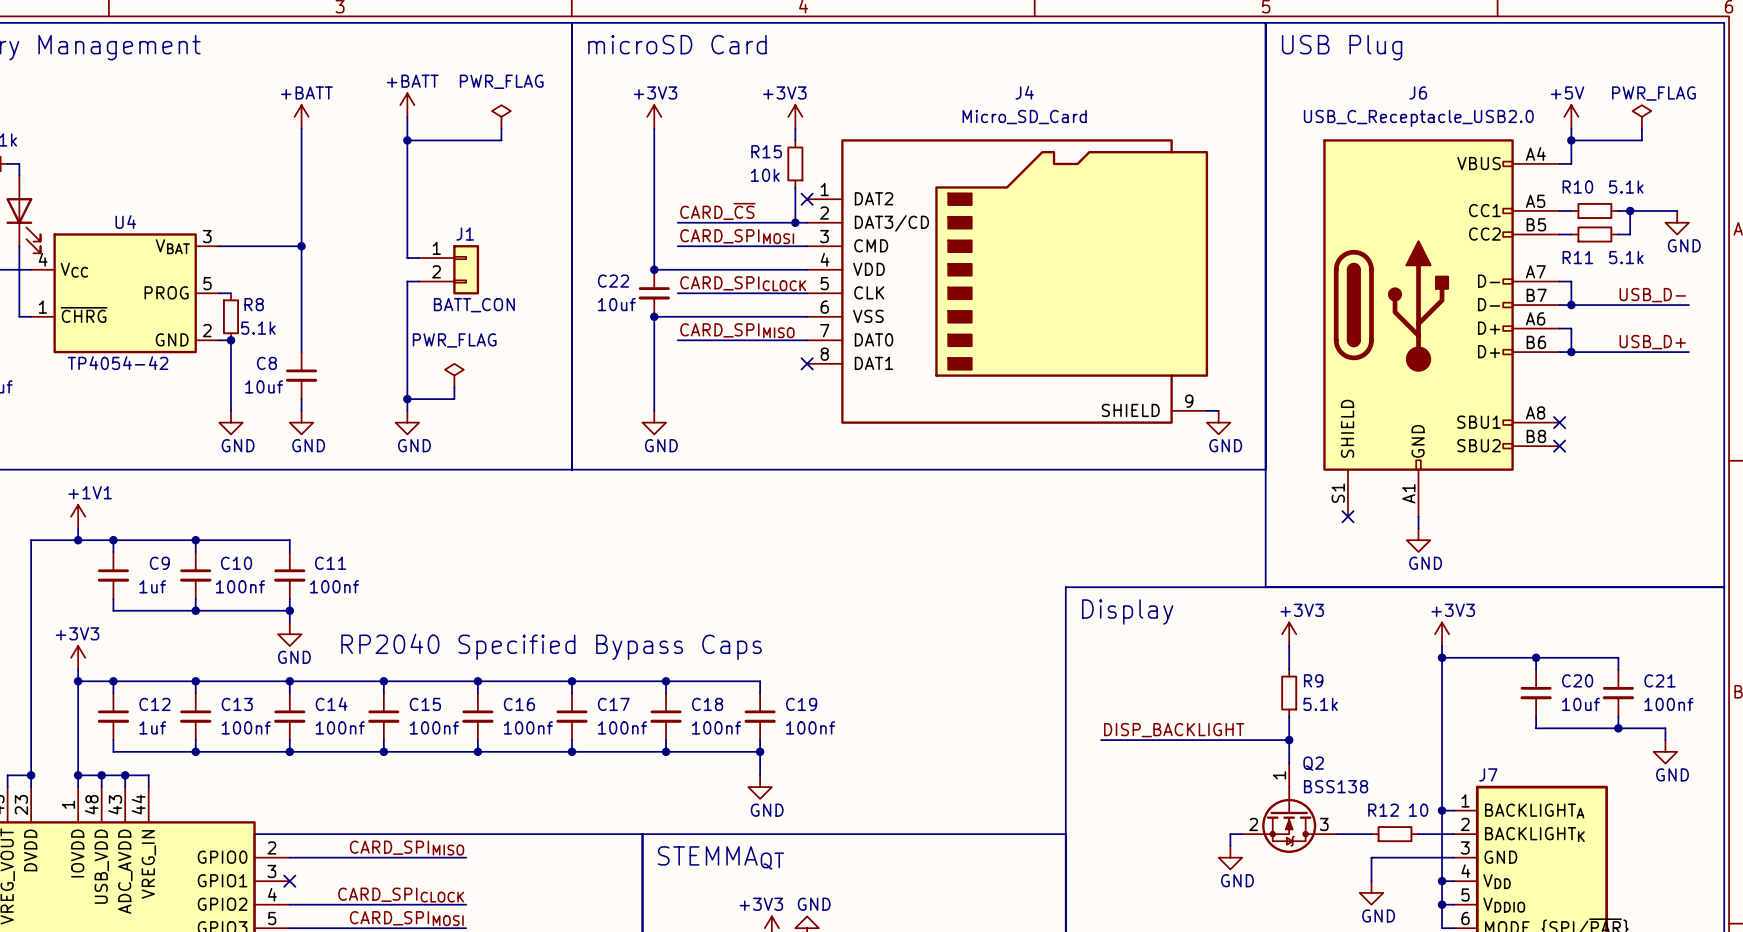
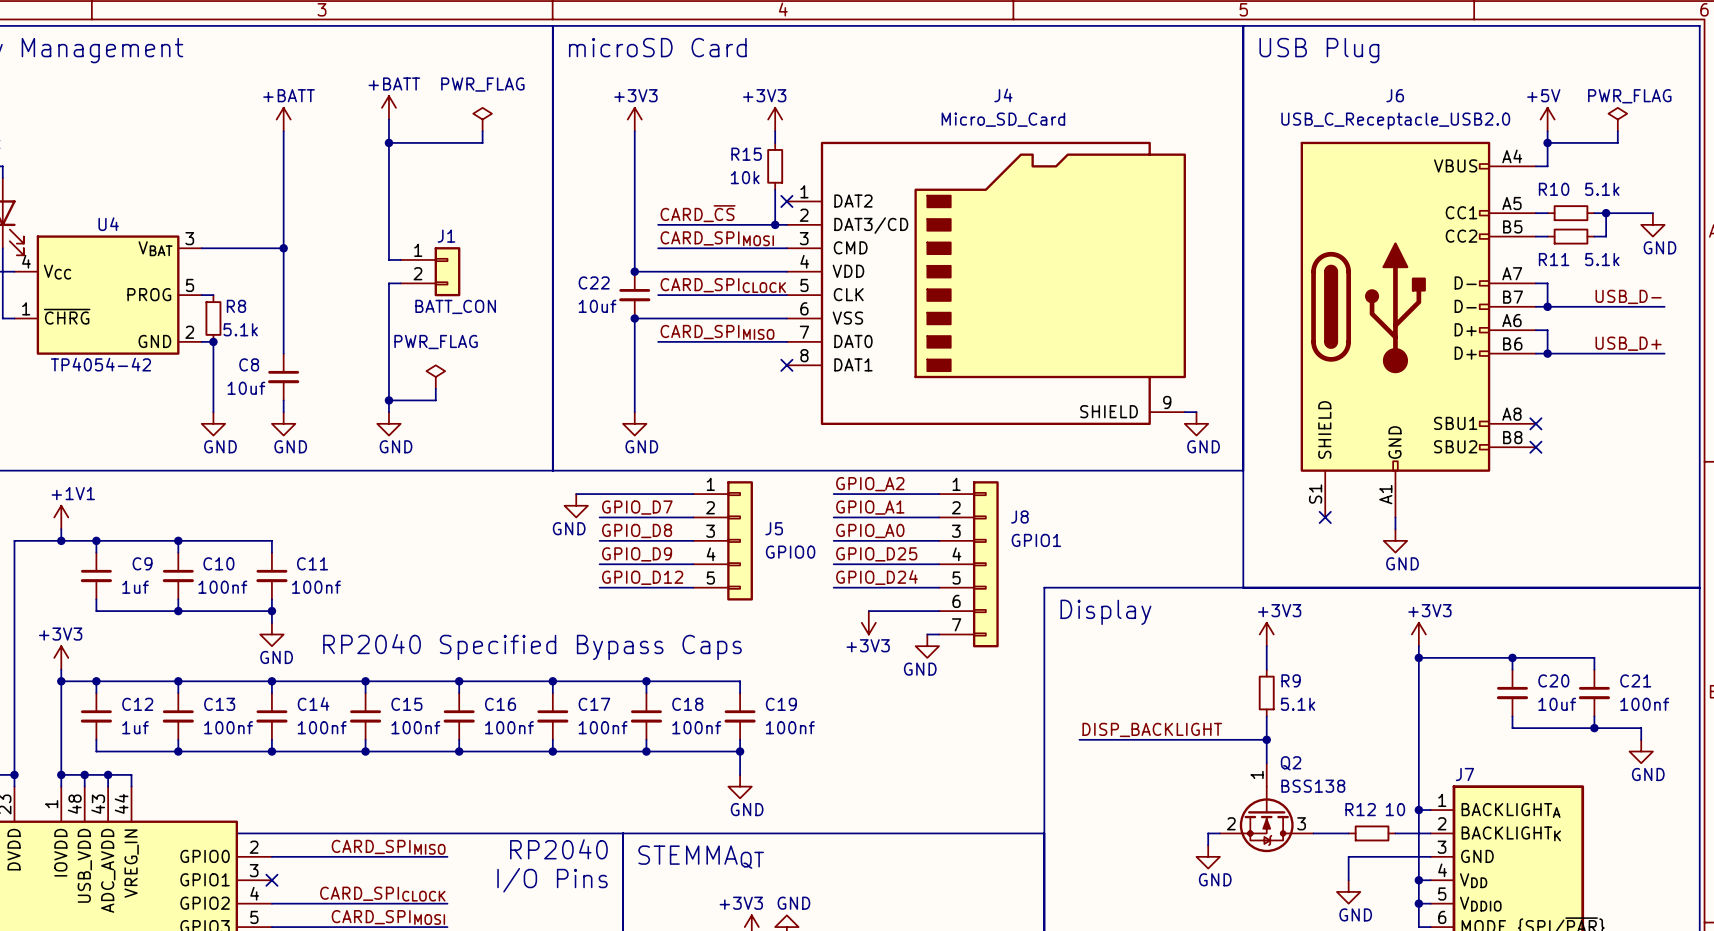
label: none -> GPIO_A2 (870, 484)
wire: none -> (576, 494) (693, 494)
wire: none -> (833, 494) (939, 494)
power symbol: none -> GND (576, 505)
label: none -> GPIO_D7 (637, 507)
label: none -> GPIO_A1 (870, 507)
wire: none -> (599, 517) (693, 517)
wire: none -> (833, 517) (939, 517)
label: none -> GPIO_D8 (637, 530)
label: none -> GPIO_A0 (870, 530)
wire: none -> (599, 540) (693, 540)
J5: none -> GPIO0 (723, 540)
wire: none -> (833, 540) (939, 540)
label: none -> GPIO_D9 (637, 554)
label: none -> GPIO_D25 (876, 554)
wire: none -> (599, 564) (693, 564)
wire: none -> (833, 564) (939, 564)
J8: none -> GPIO1 (968, 564)
label: none -> GPIO_D12 (642, 577)
label: none -> GPIO_D24 (876, 577)
wire: none -> (599, 587) (693, 587)
wire: none -> (833, 587) (939, 587)
wire: none -> (868, 611) (939, 611)
power symbol: none -> +3V3 (868, 622)
wire: none -> (927, 634) (939, 634)
power symbol: none -> GND (927, 646)
text: none -> RP2040 (558, 849)
text: none -> I/O Pins (552, 880)

